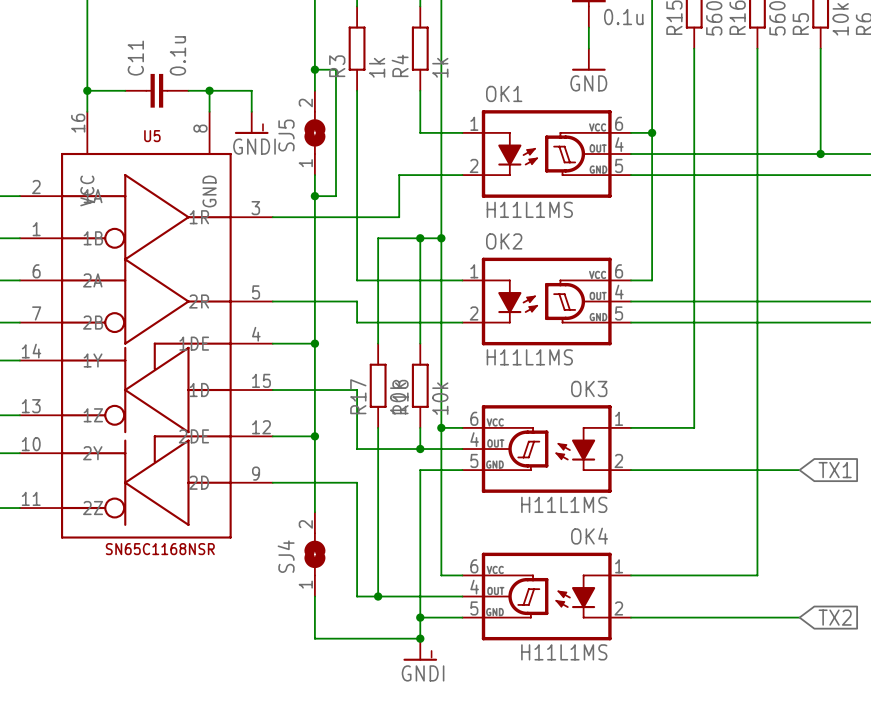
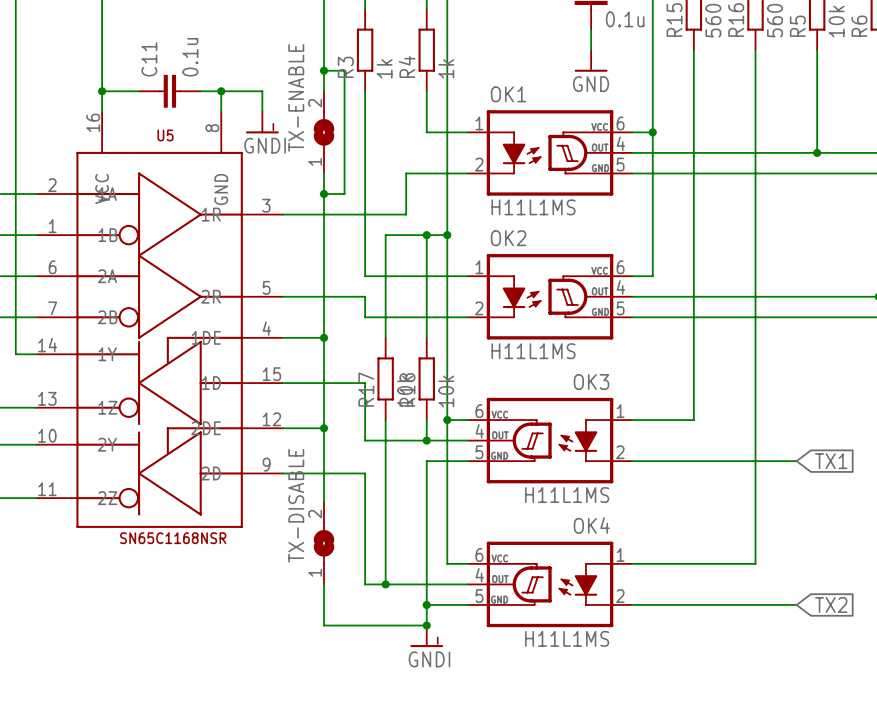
SJ5 name: SJ5 (286, 135) -> TX-ENABLE (296, 97)
SJ4 name: SJ4 (286, 556) -> TX-DISABLE (296, 505)

